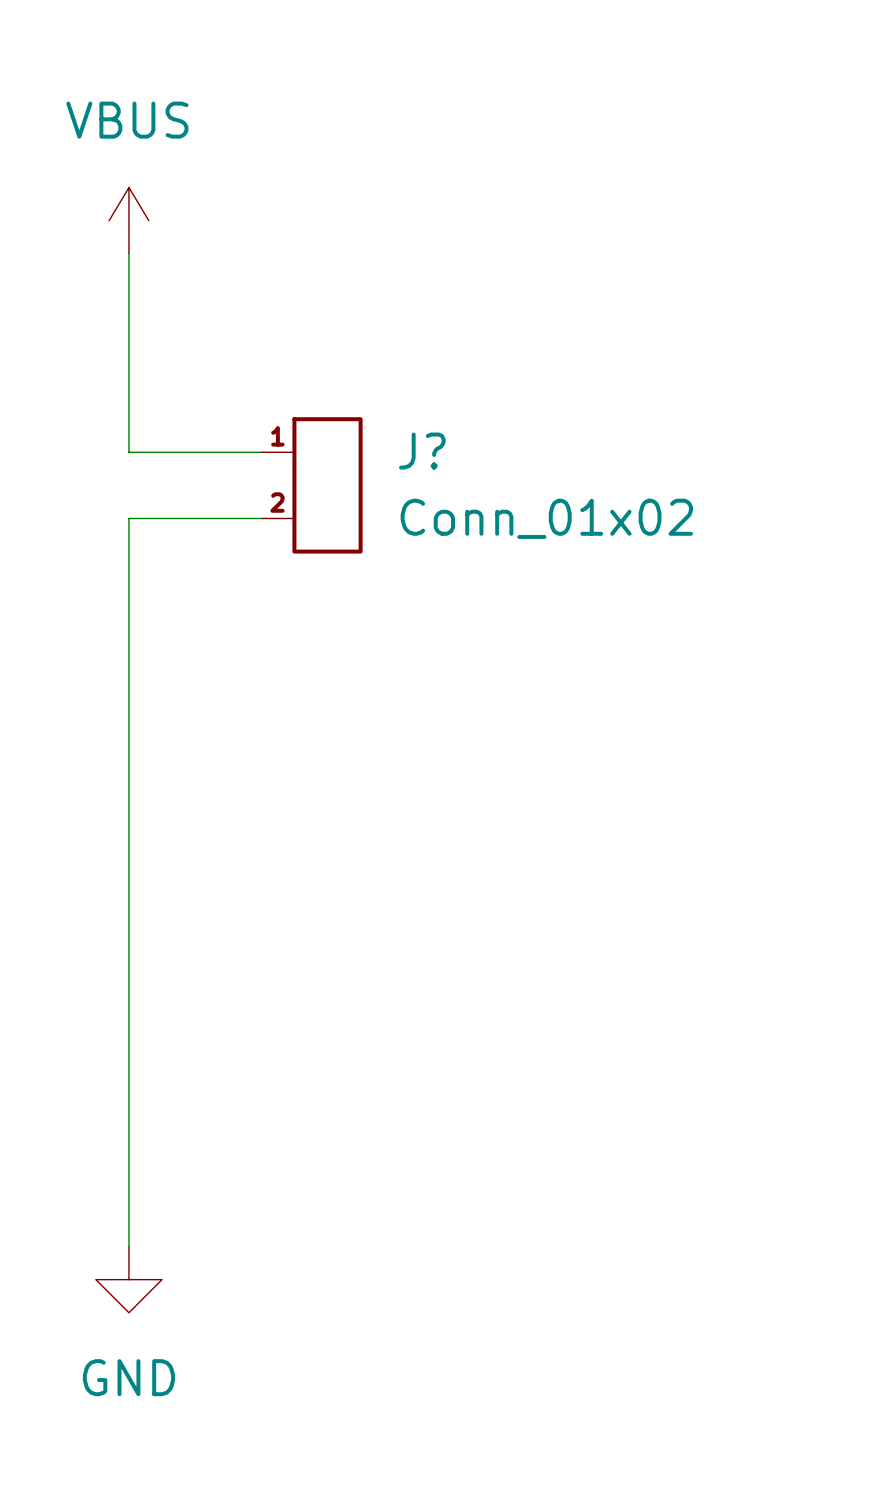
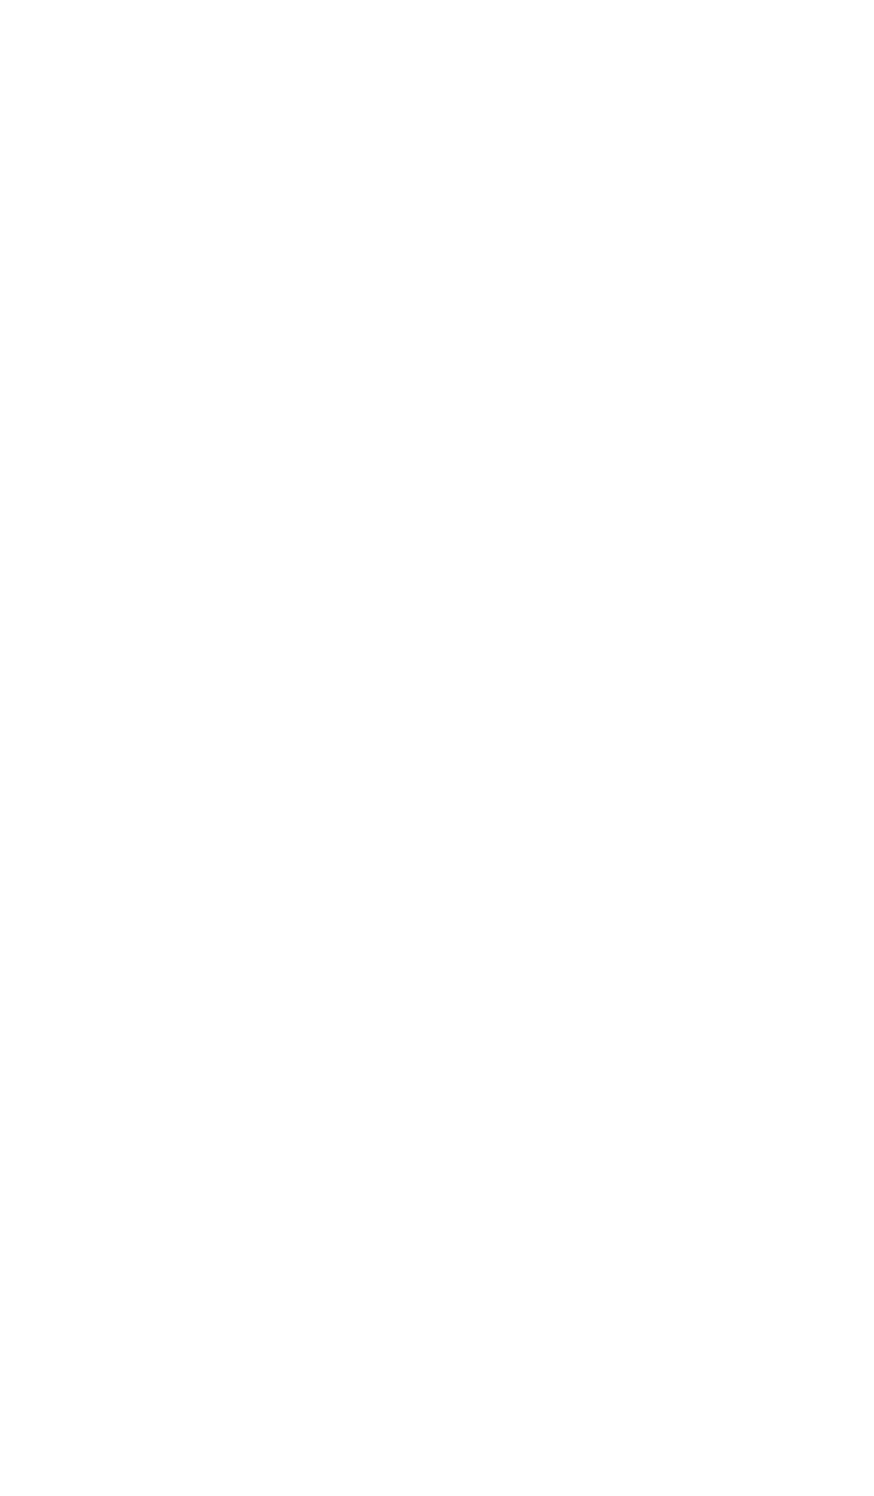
power symbol: VBUS (128, 220) -> none
wire: (128, 253) (128, 452) (261, 452) -> none
J?: Conn_01x02 (311, 485) -> none
wire: (261, 518) (128, 518) (128, 1246) -> none
power symbol: GND (128, 1279) -> none

